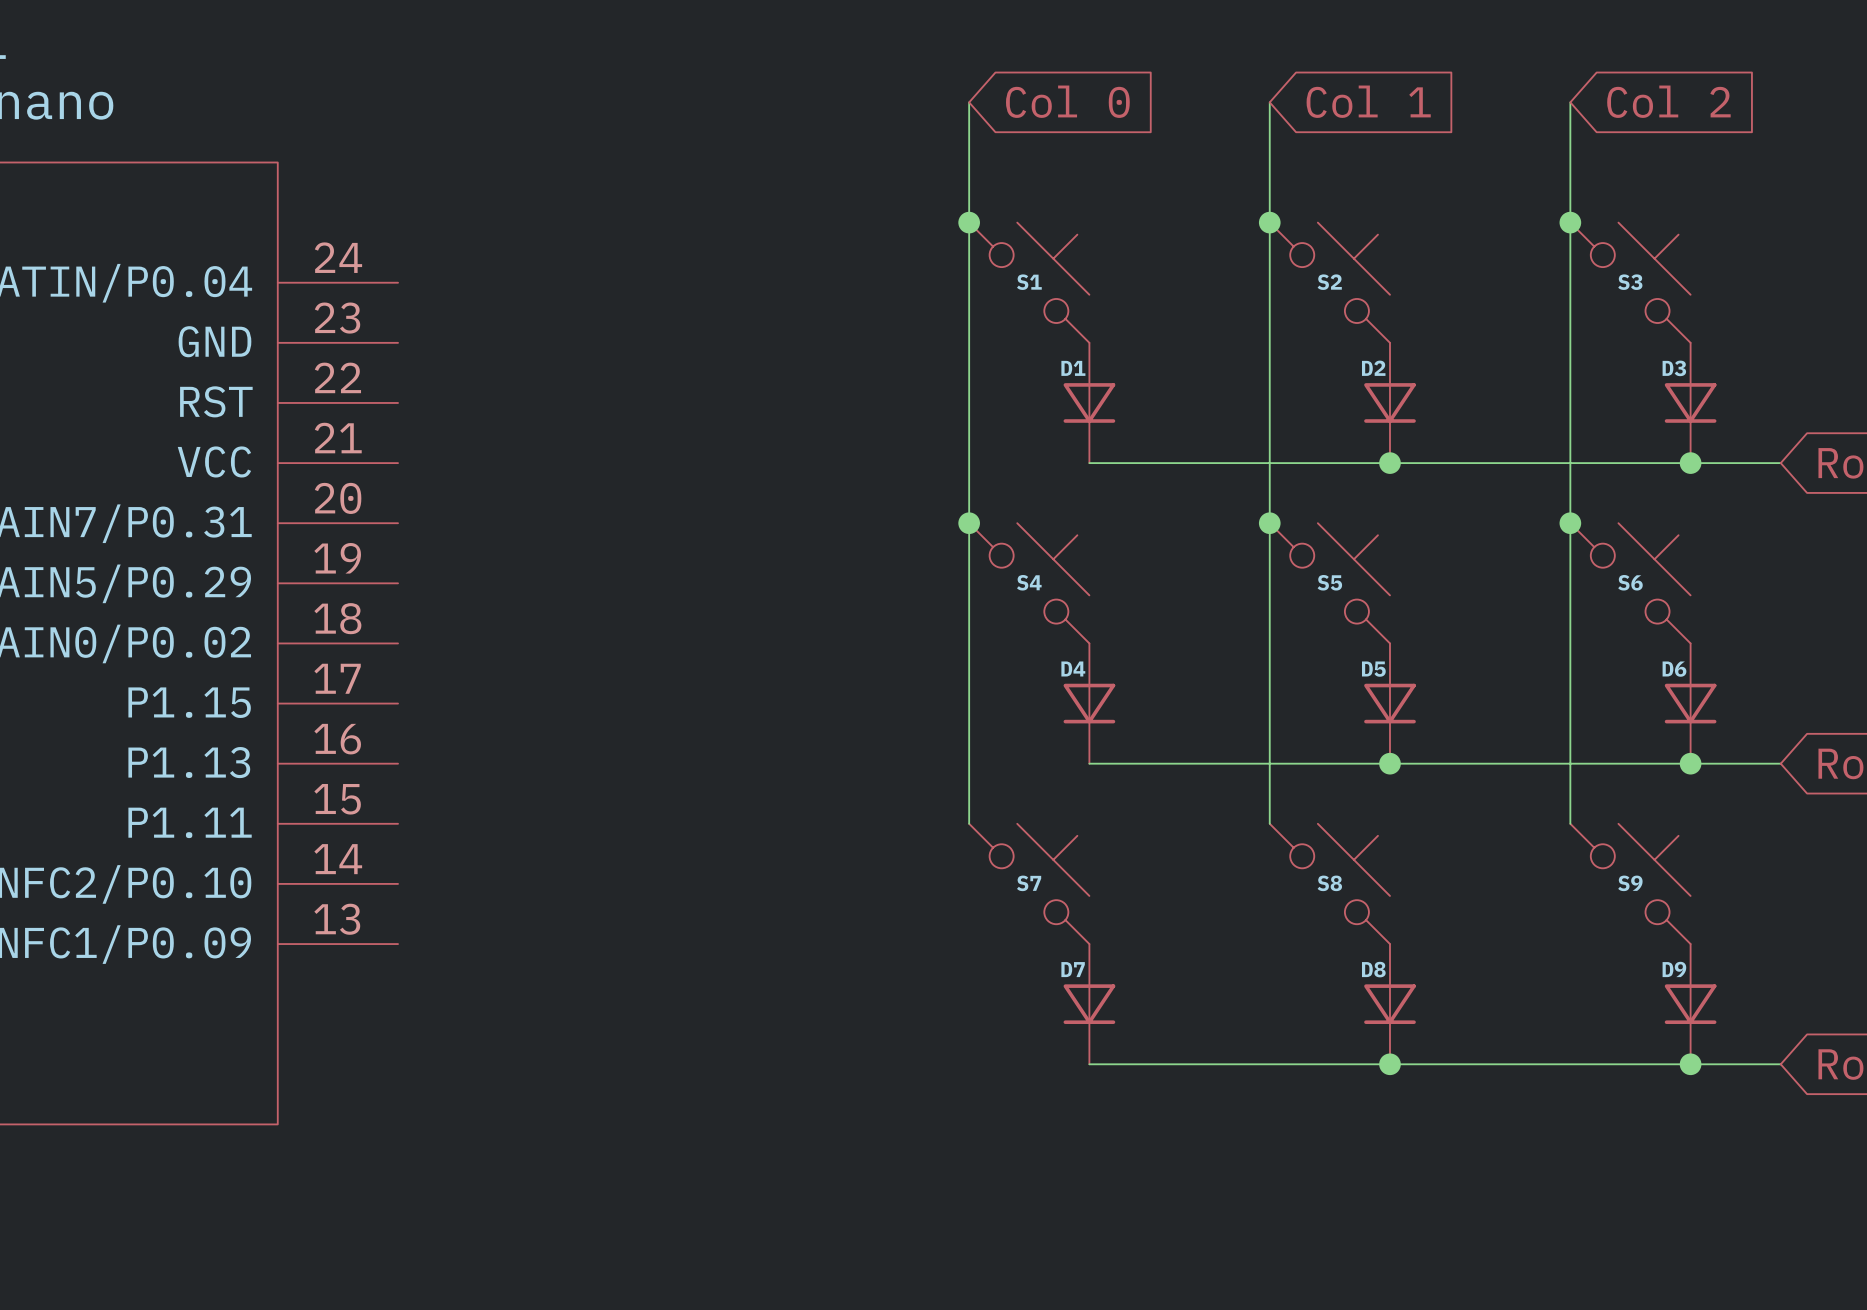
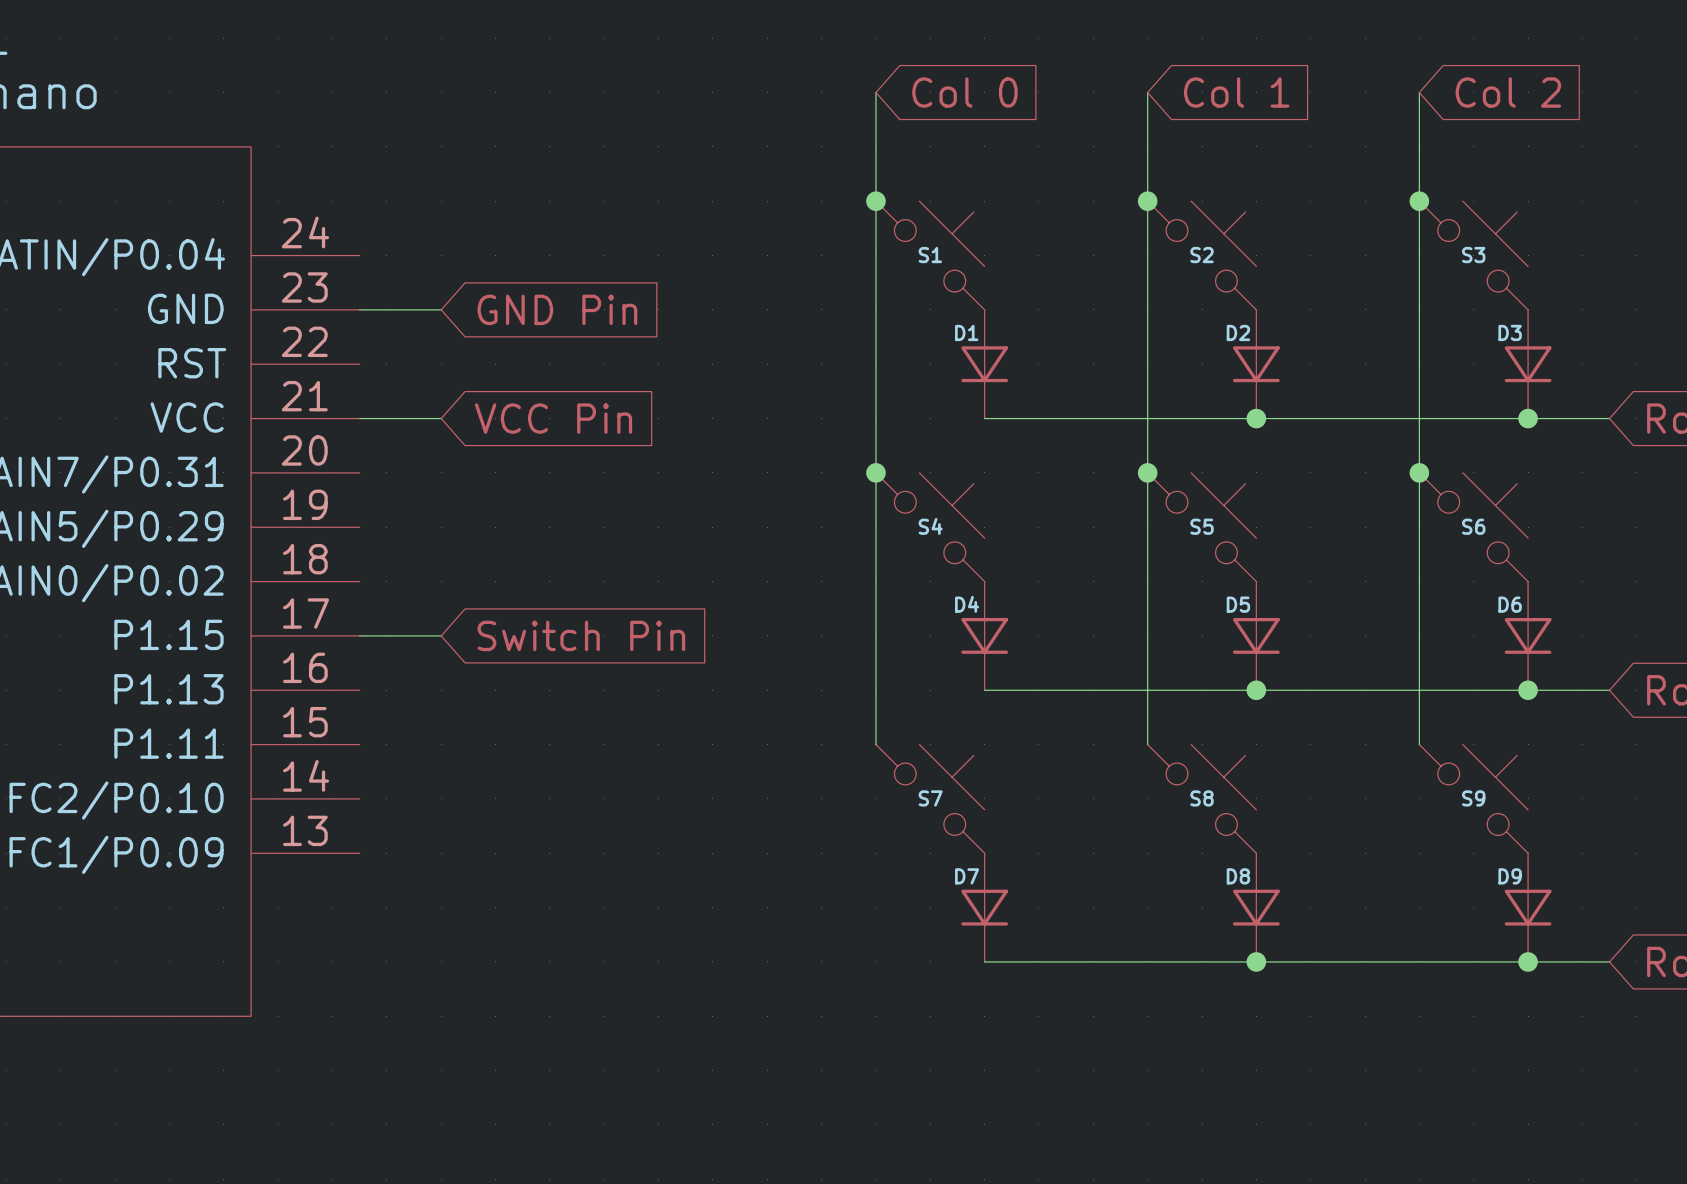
wire: none -> (359, 309) (441, 309)
global label: none -> GND Pin (557, 309)
global label: none -> VCC Pin (553, 418)
wire: none -> (359, 418) (441, 418)
global label: none -> Switch Pin (581, 635)
wire: none -> (359, 635) (441, 635)

